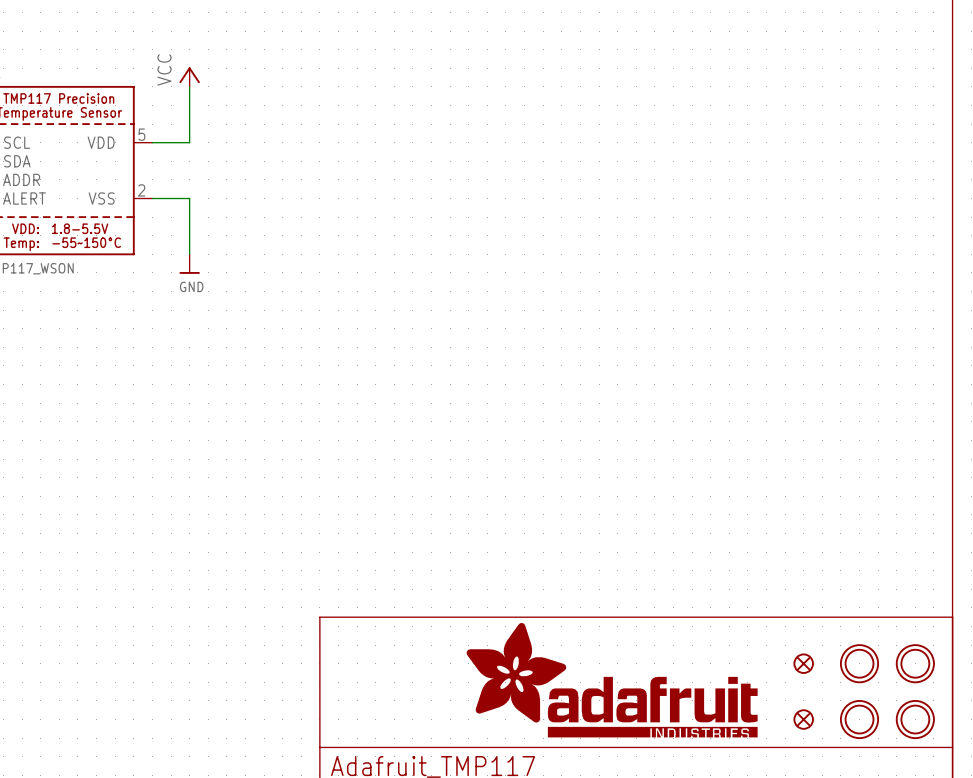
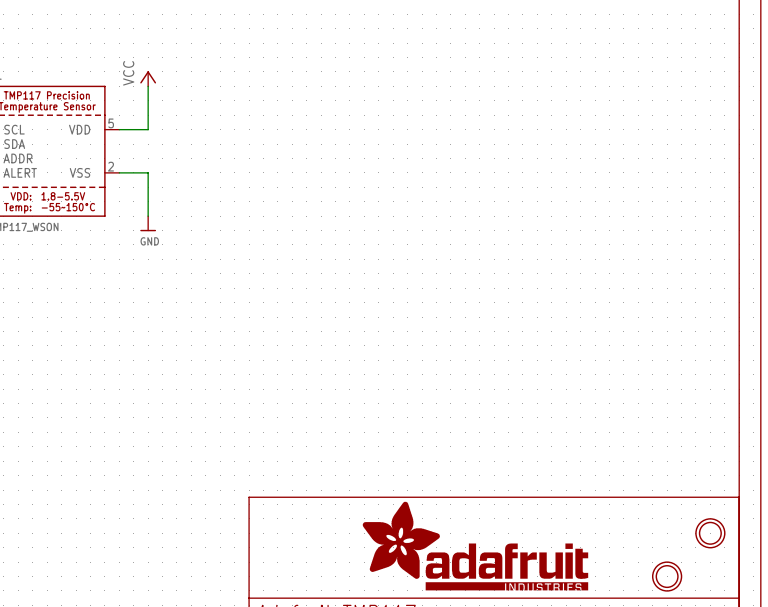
part: (803, 663) -> none
part: (859, 663) -> none
part: (803, 719) -> none
part: (915, 719) -> none

